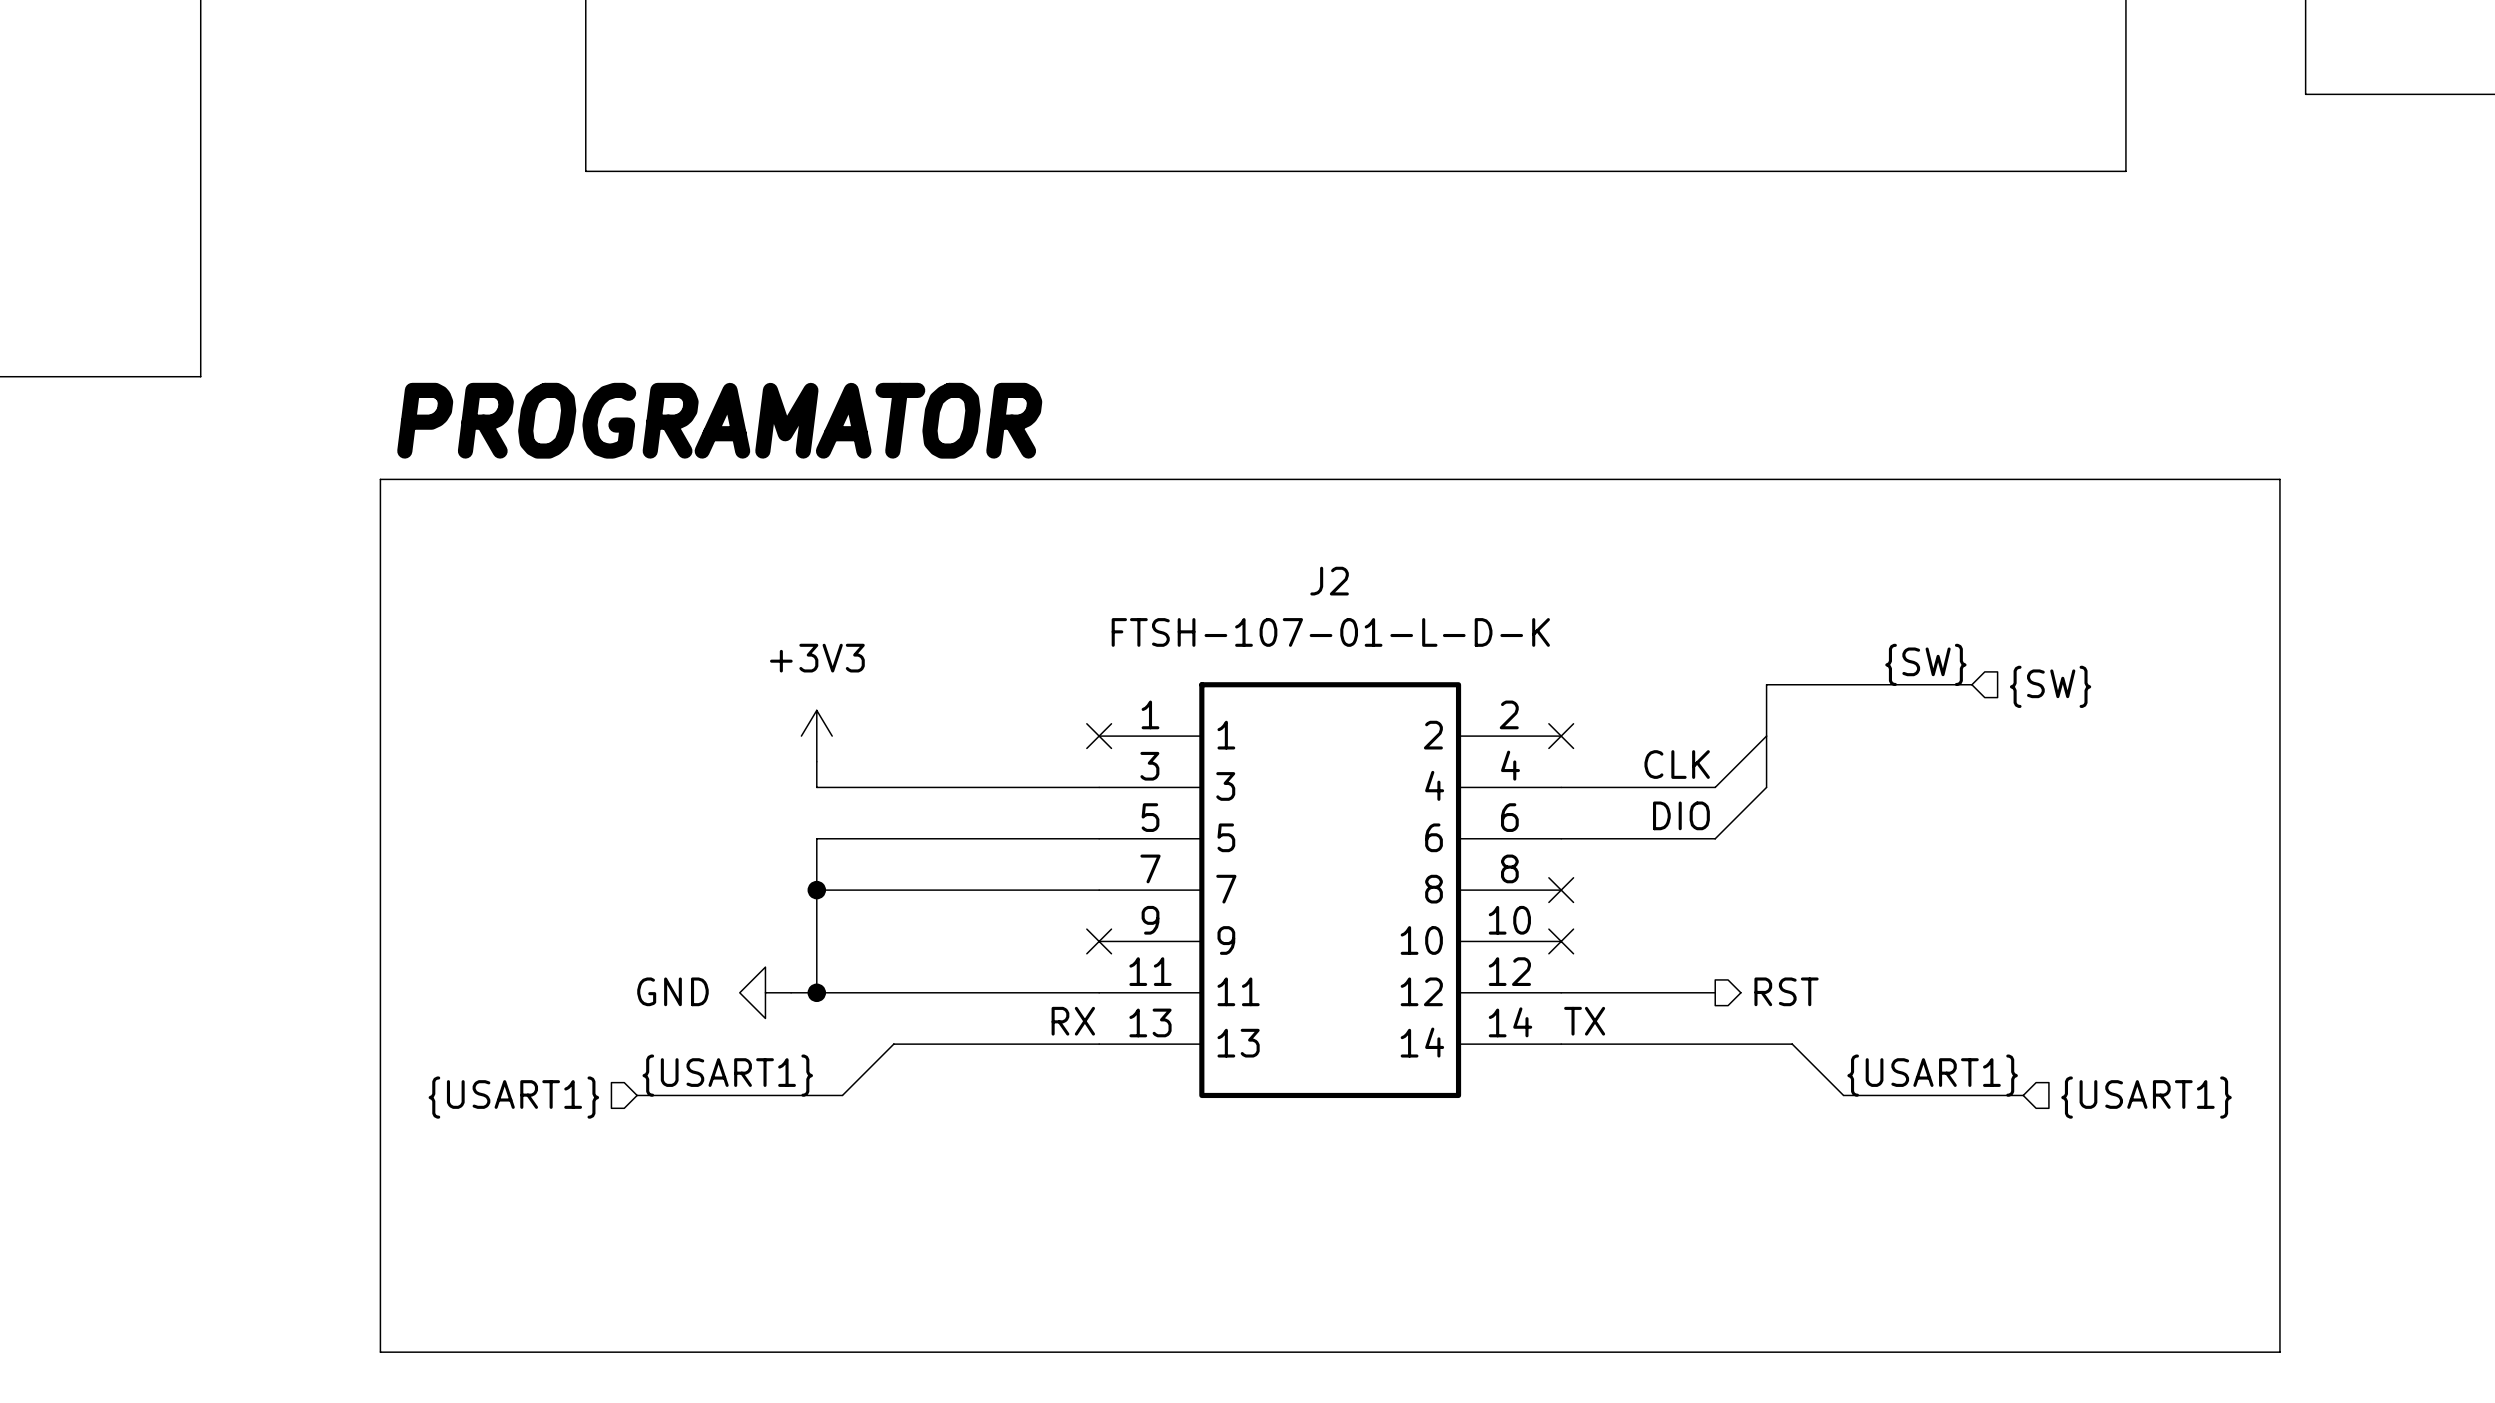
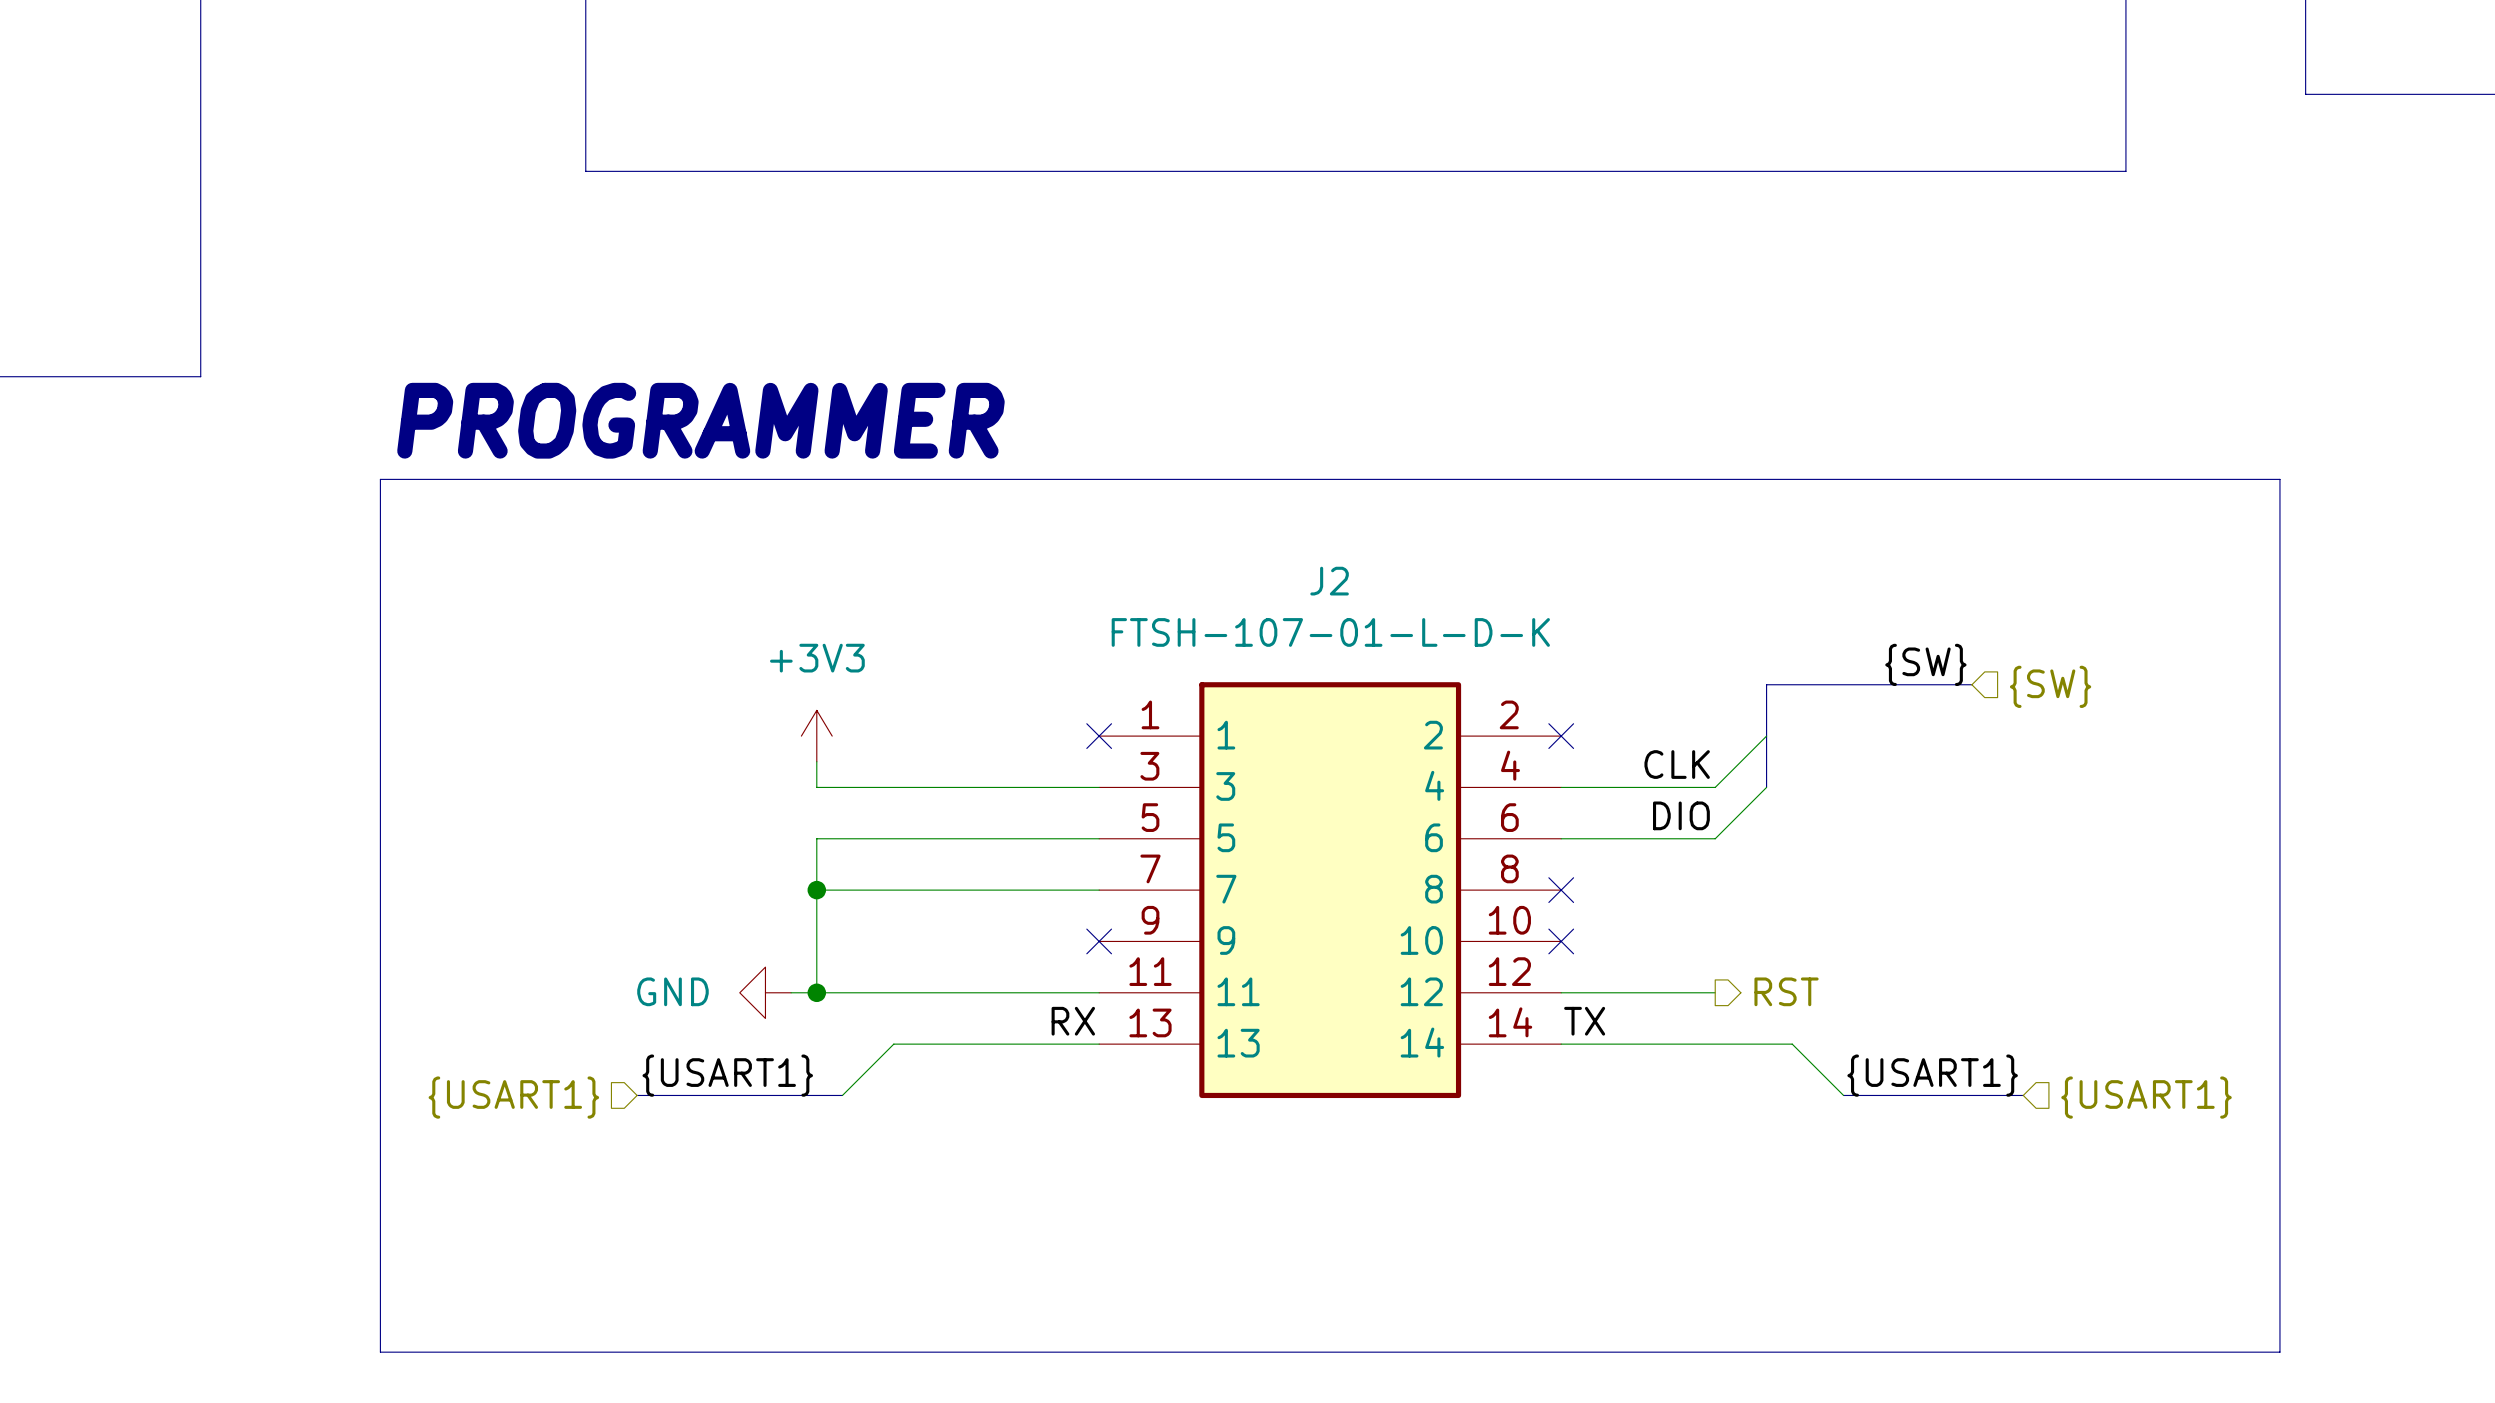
text: PROGRAMATOR (719, 420) -> PROGRAMMER (700, 420)

